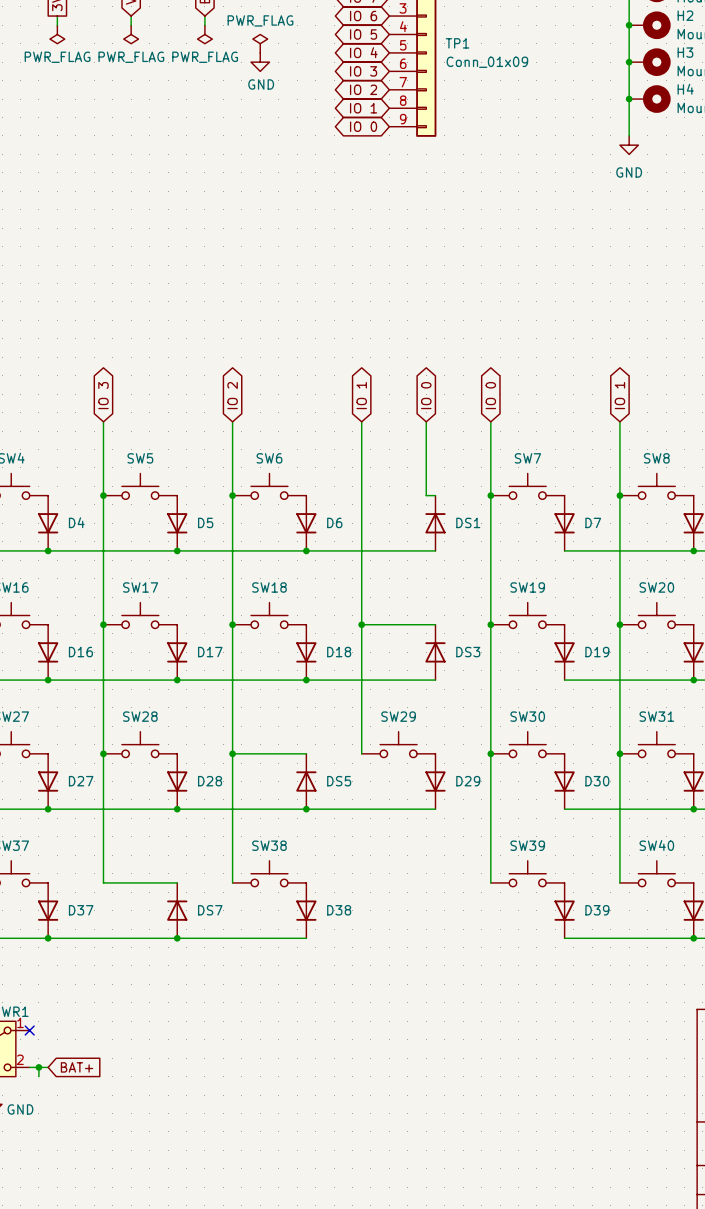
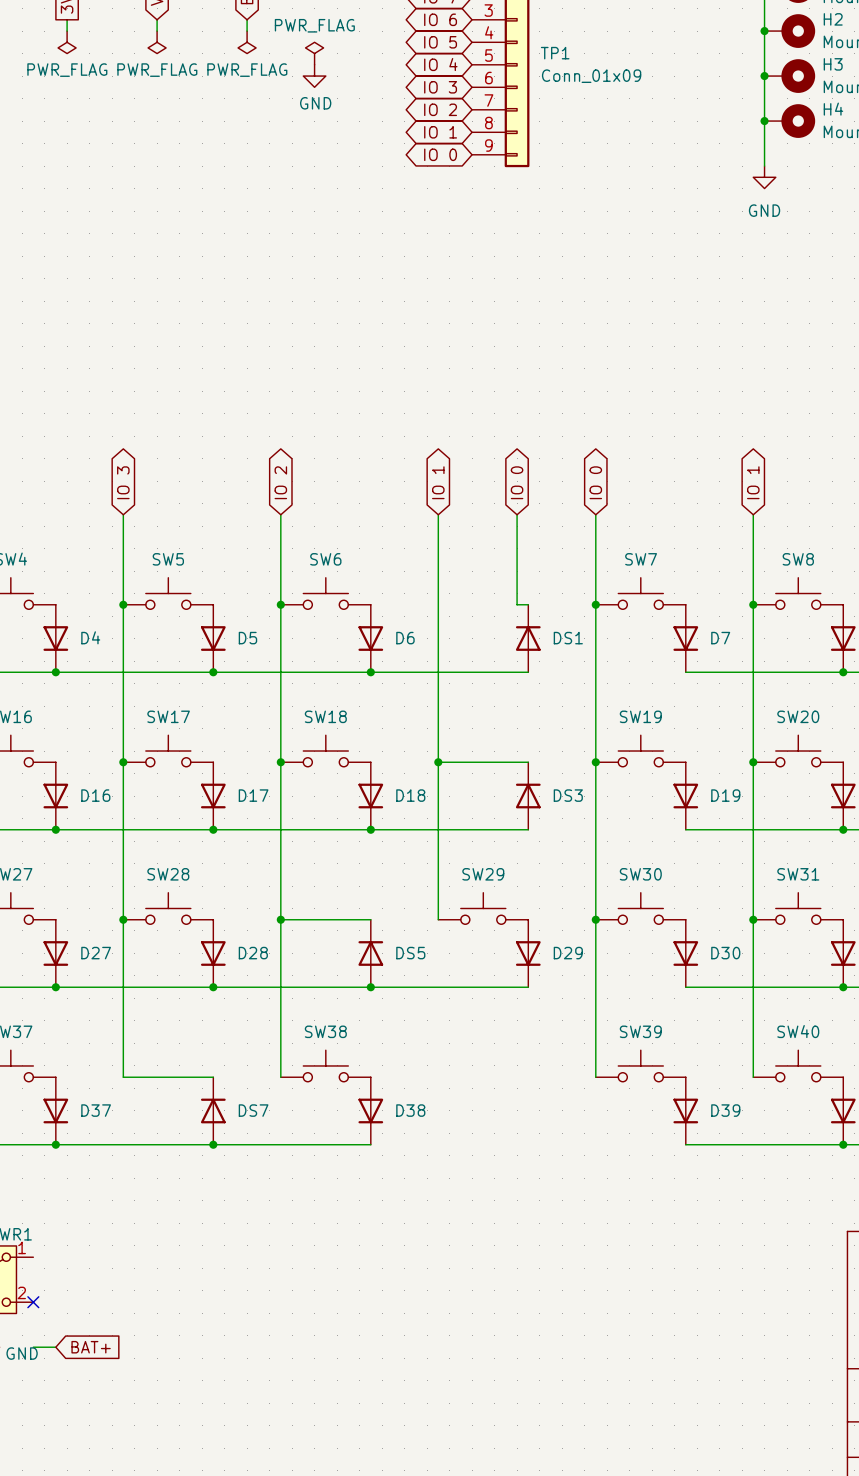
no-connect mark position: (29, 1030) -> (33, 1302)
wire: (29, 1067) (48, 1067) -> (33, 1347) (55, 1347)
wire: (38, 1067) (38, 1076) -> none
junction: (38, 1067) -> none
global label position: BAT+ (77, 1067) -> BAT+ (91, 1347)

